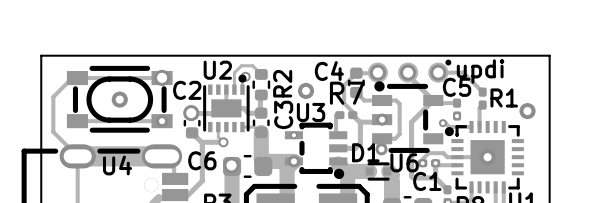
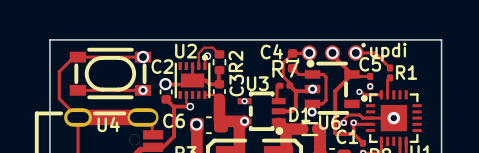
via: (306, 90) -> none
via: (119, 99) -> none
via: (527, 111) -> none

